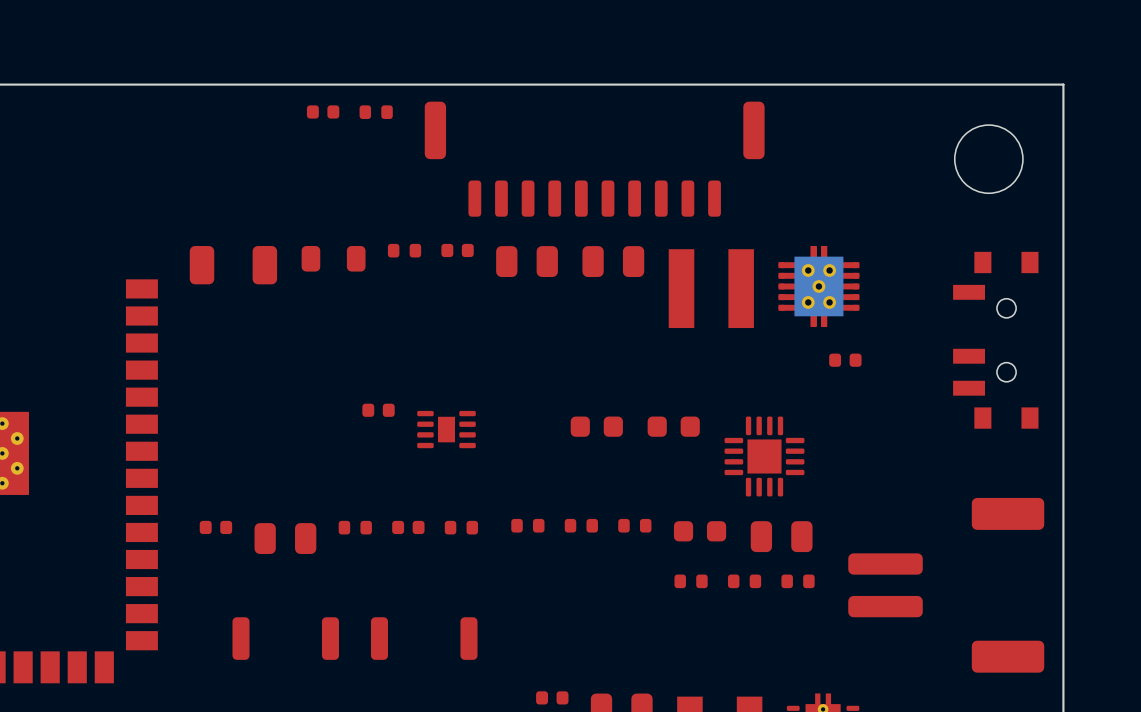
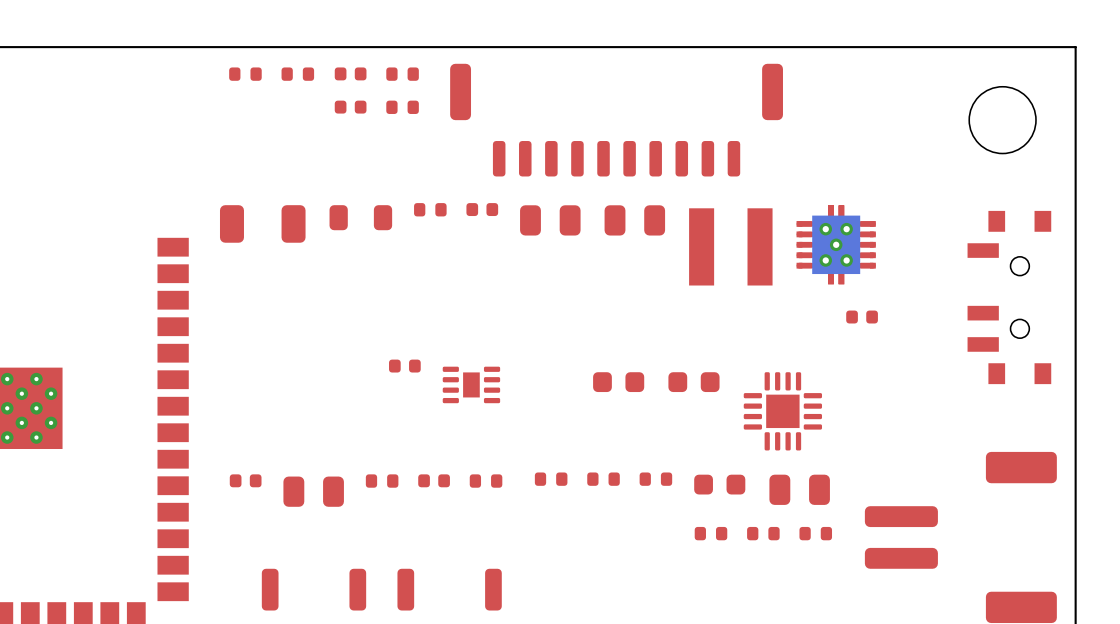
part: none -> (245, 74)
part: none -> (297, 74)
part: none -> (350, 107)
part: none -> (402, 107)

